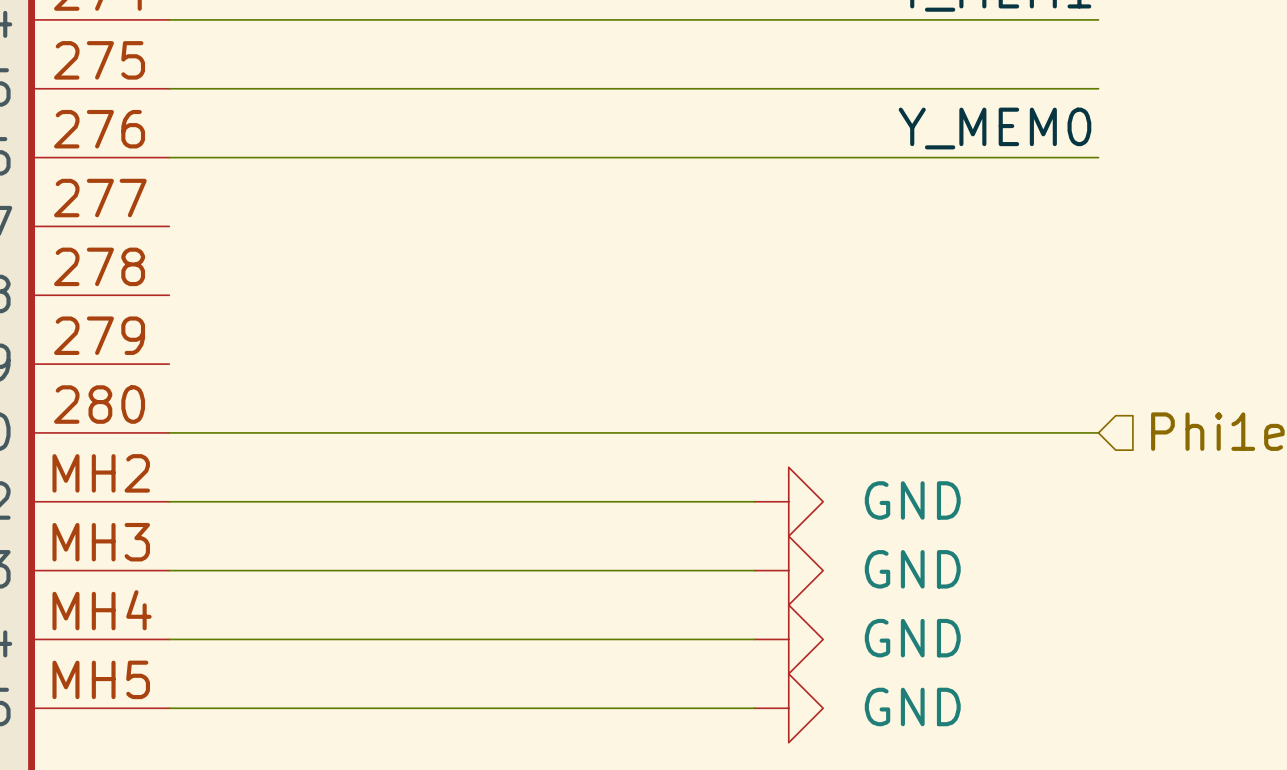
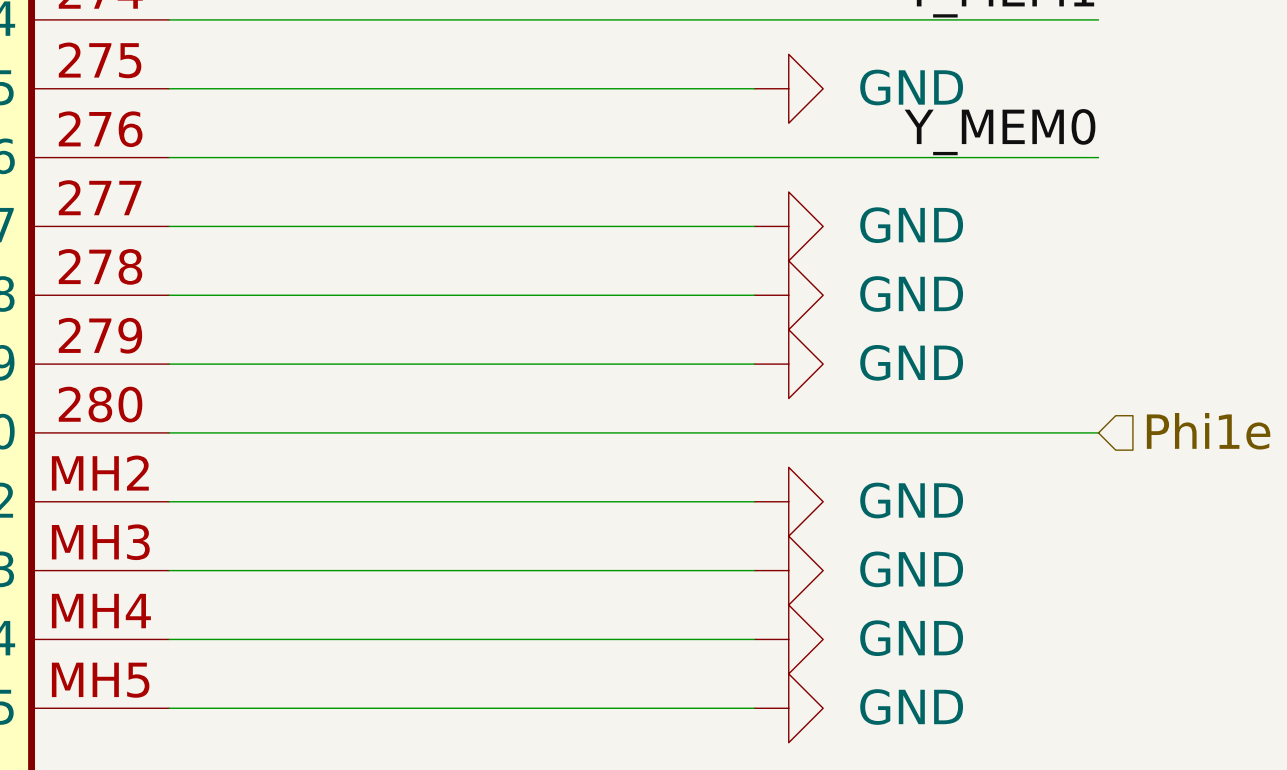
wire: (754, 88) (1098, 88) -> none
power symbol: none -> GND (788, 88)
wire: none -> (169, 226) (754, 226)
power symbol: none -> GND (788, 226)
wire: none -> (169, 295) (754, 295)
power symbol: none -> GND (788, 295)
wire: none -> (169, 364) (754, 364)
power symbol: none -> GND (788, 364)

